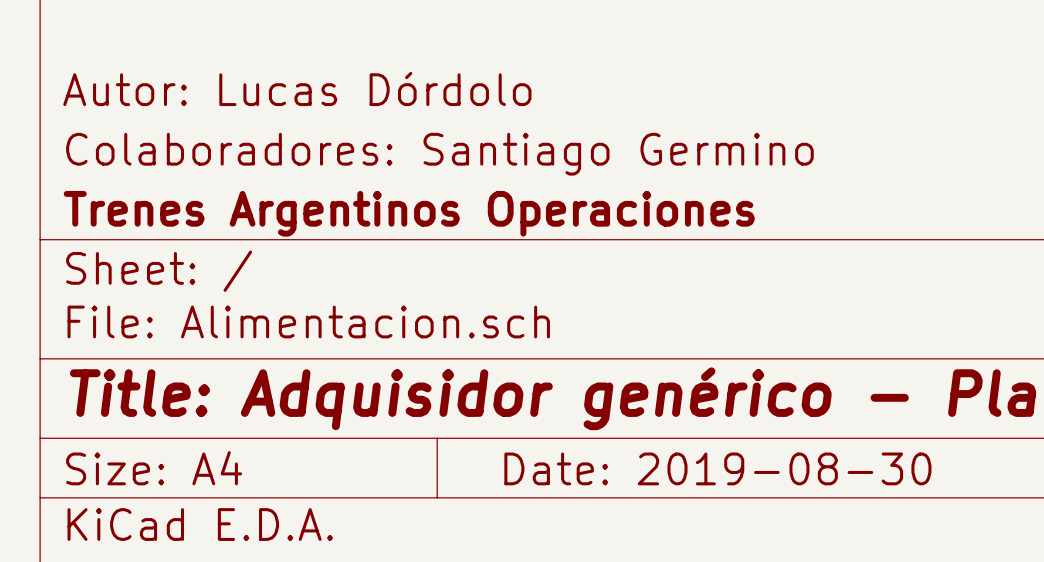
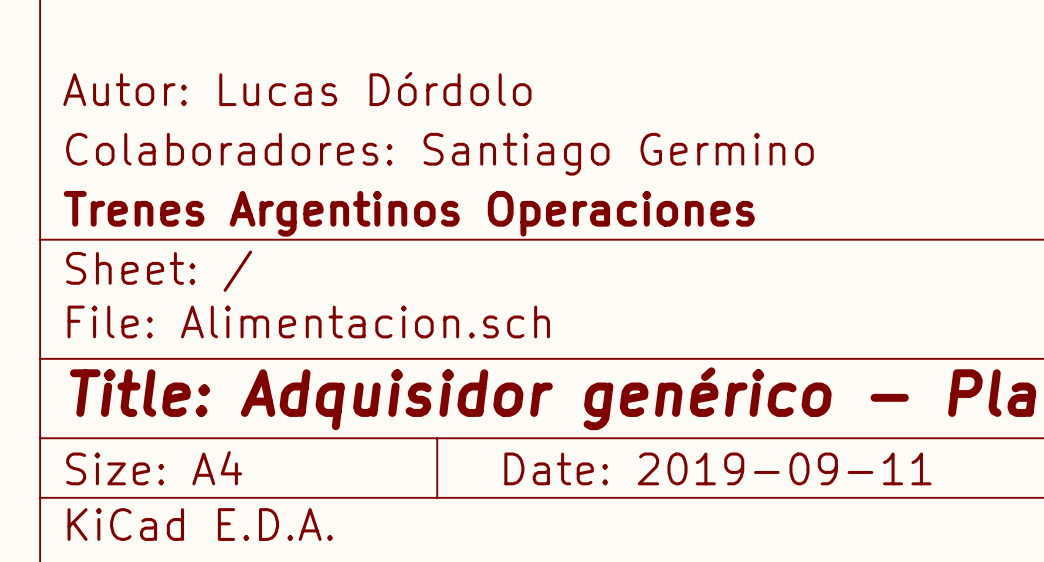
title block: Date: 2019-08-30 (717, 468) -> Date: 2019-09-11 (717, 468)

